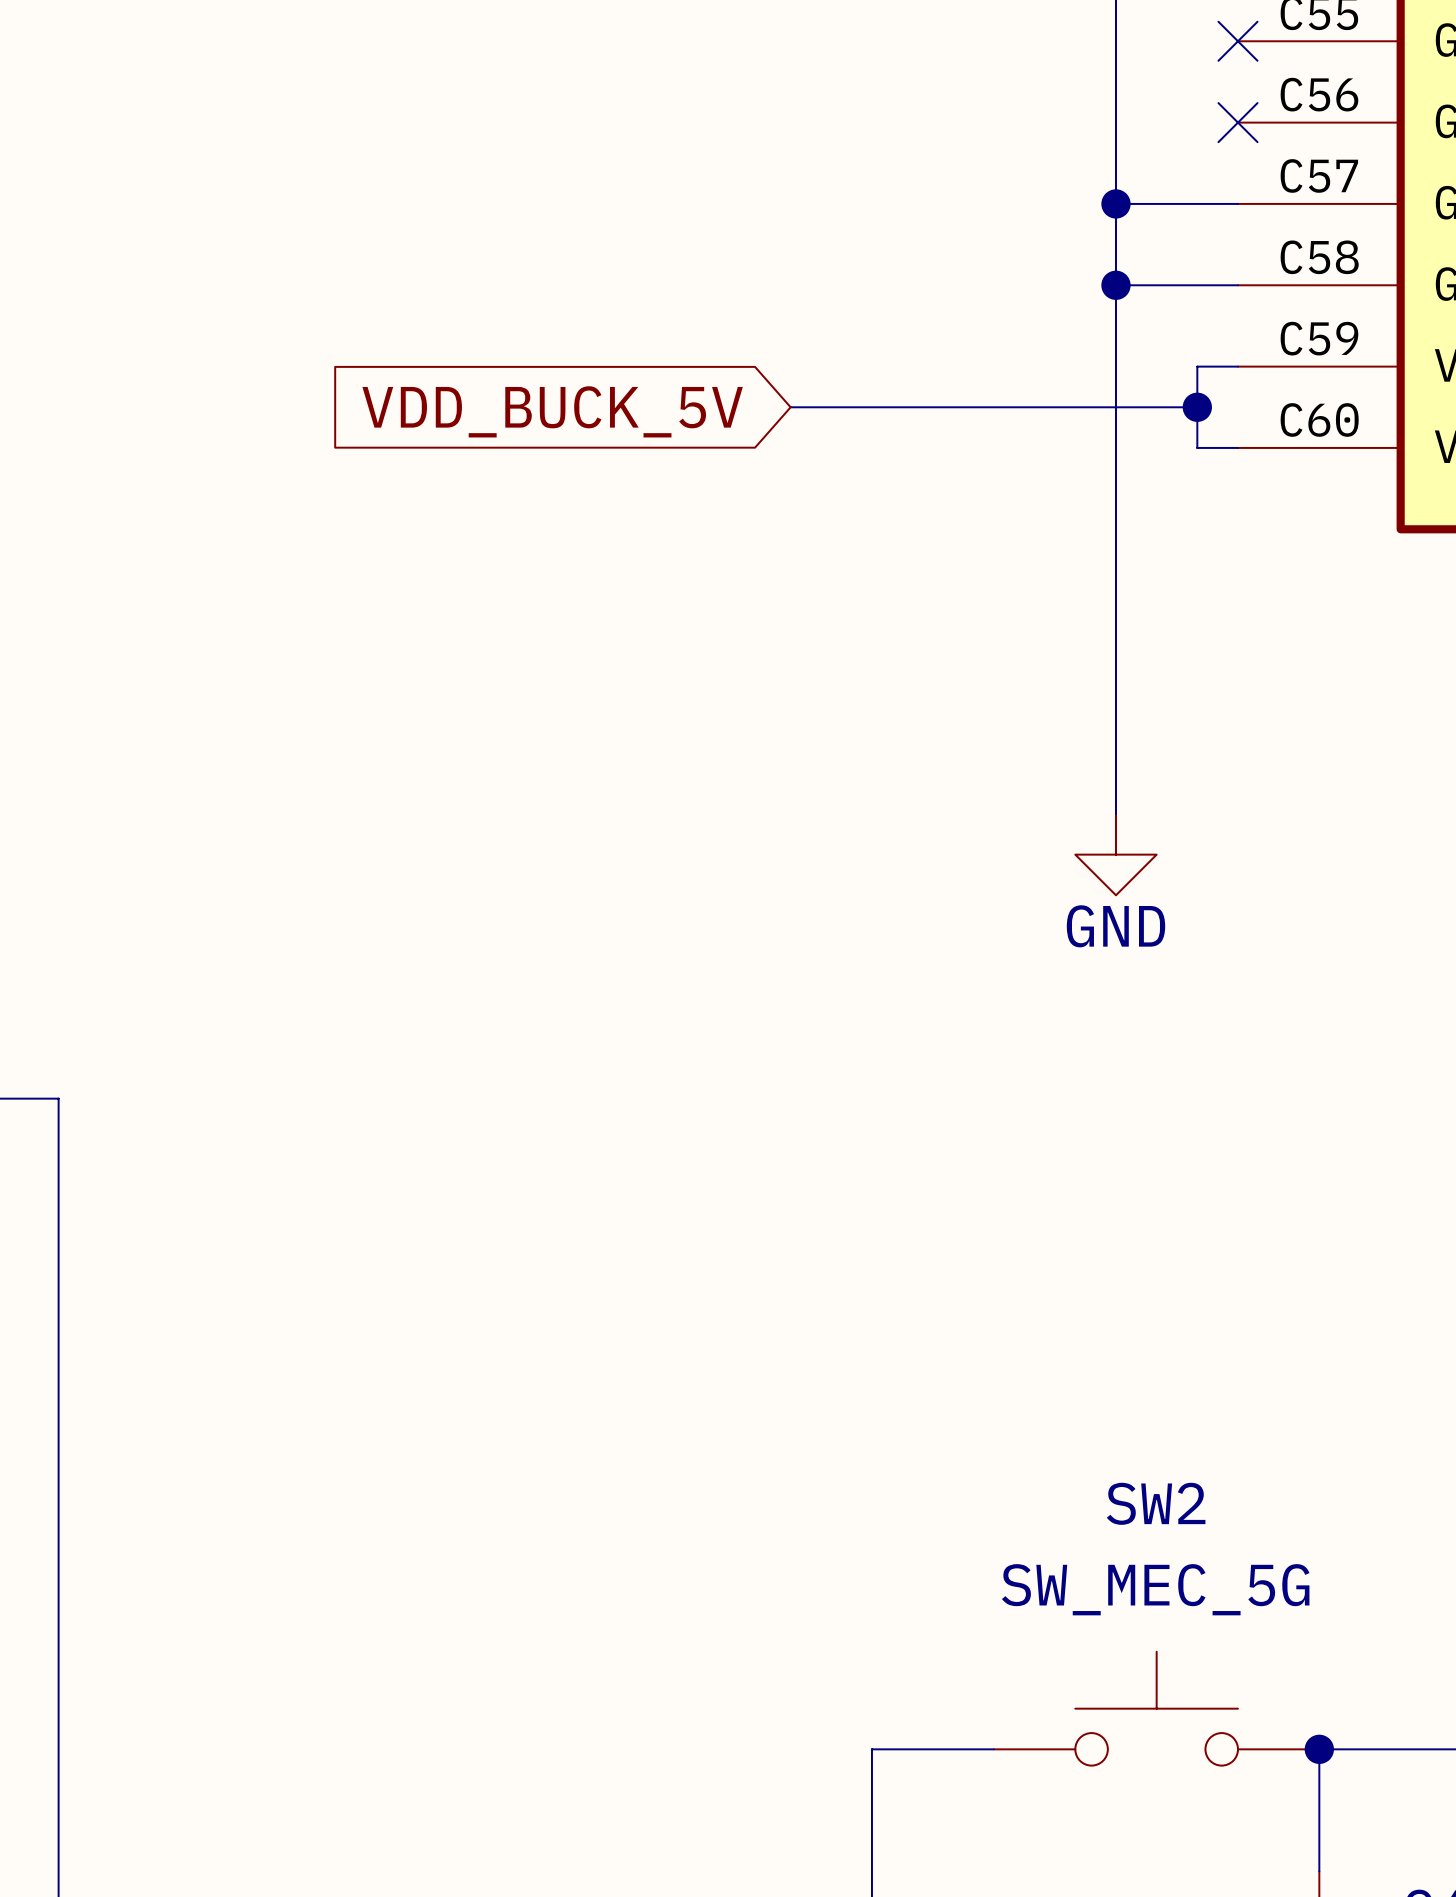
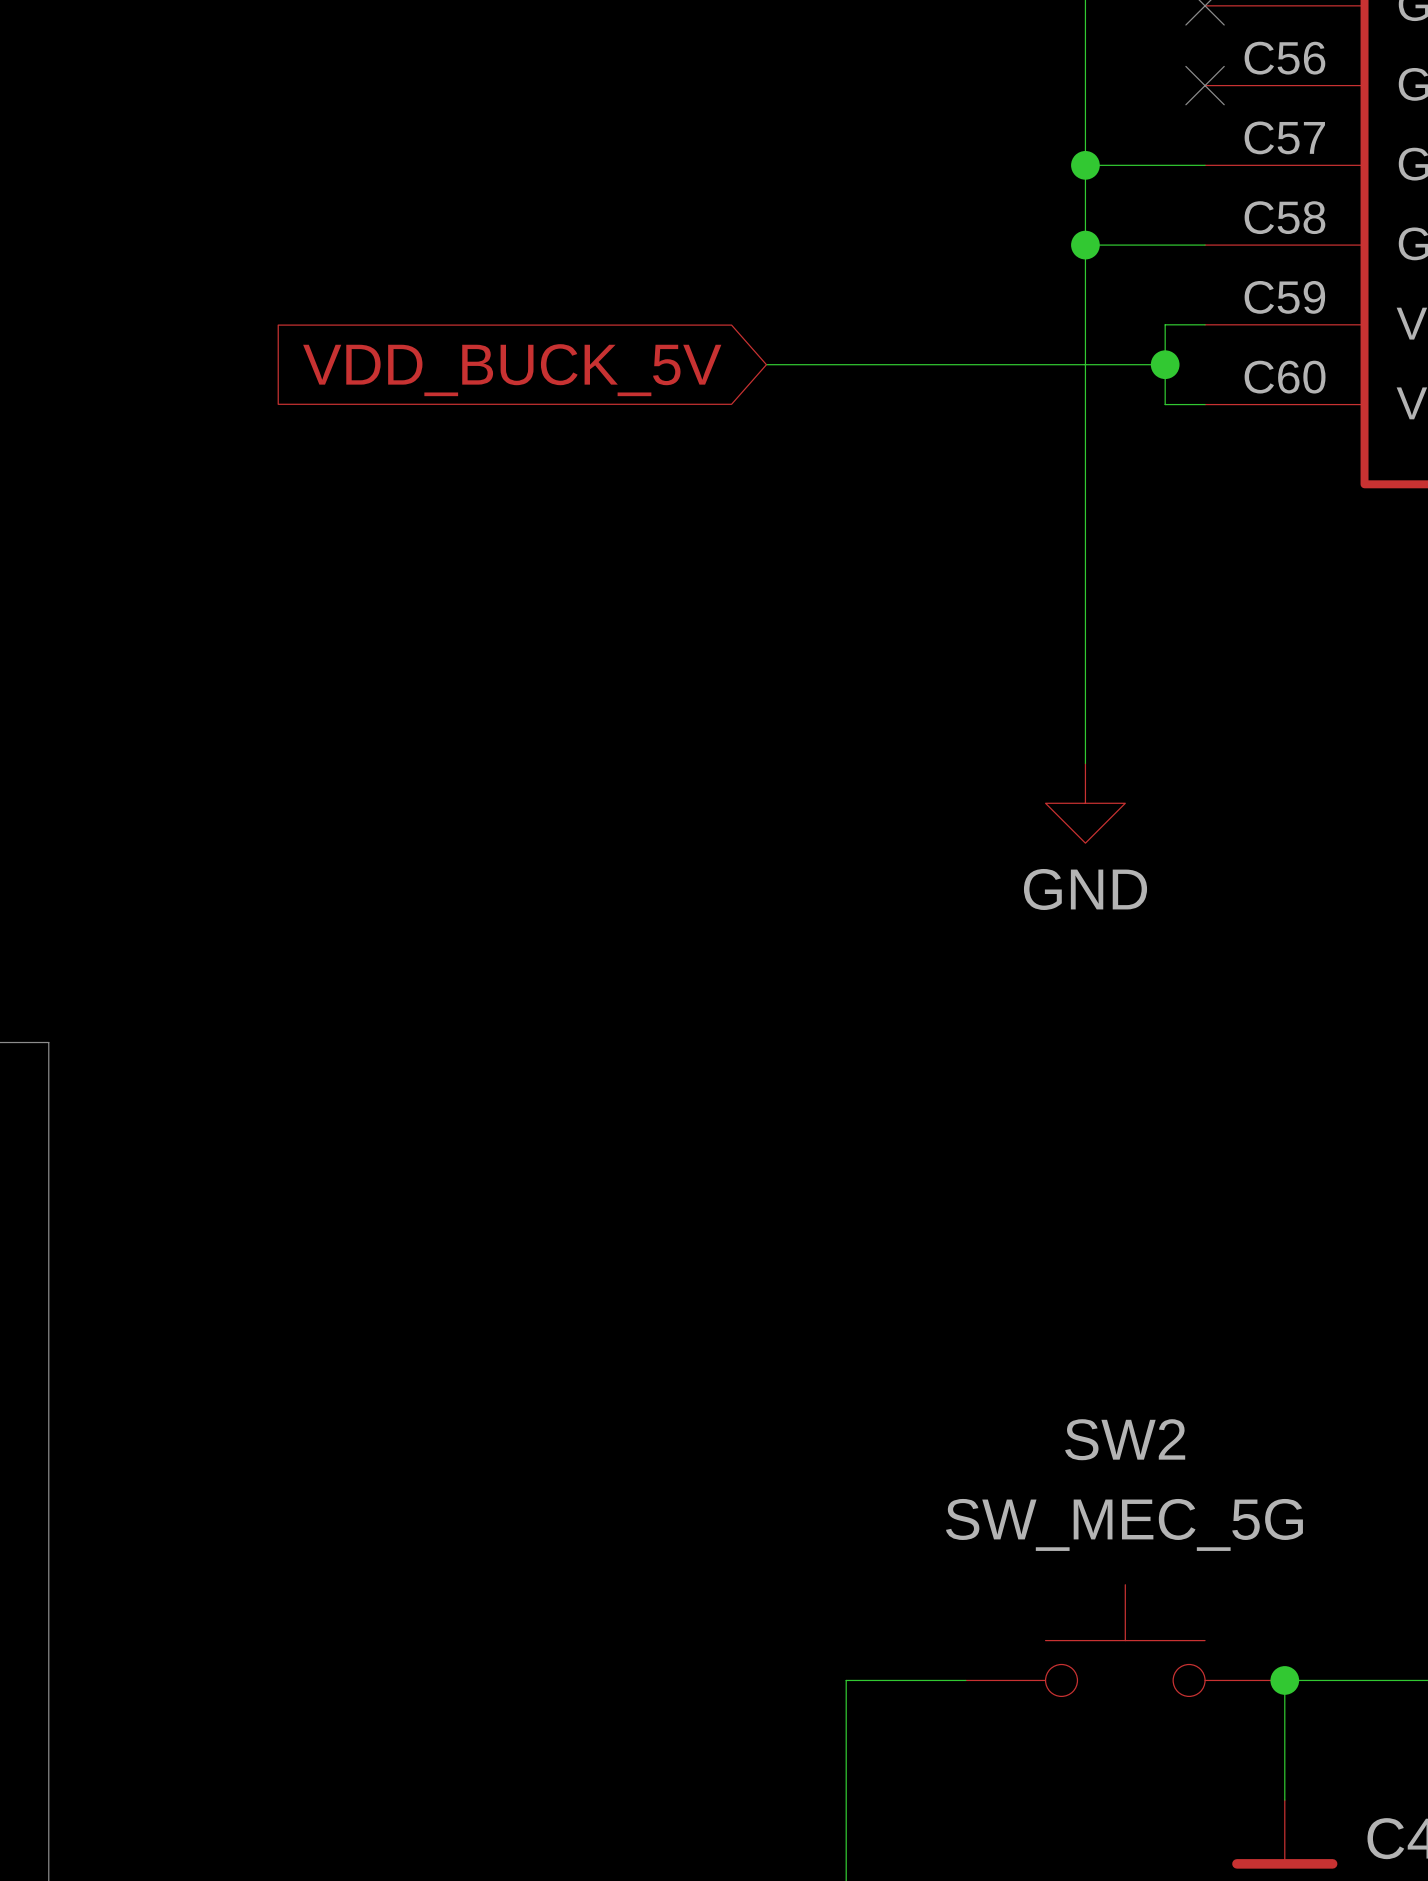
power symbol text position: GND (1115, 926) -> GND (1085, 889)

